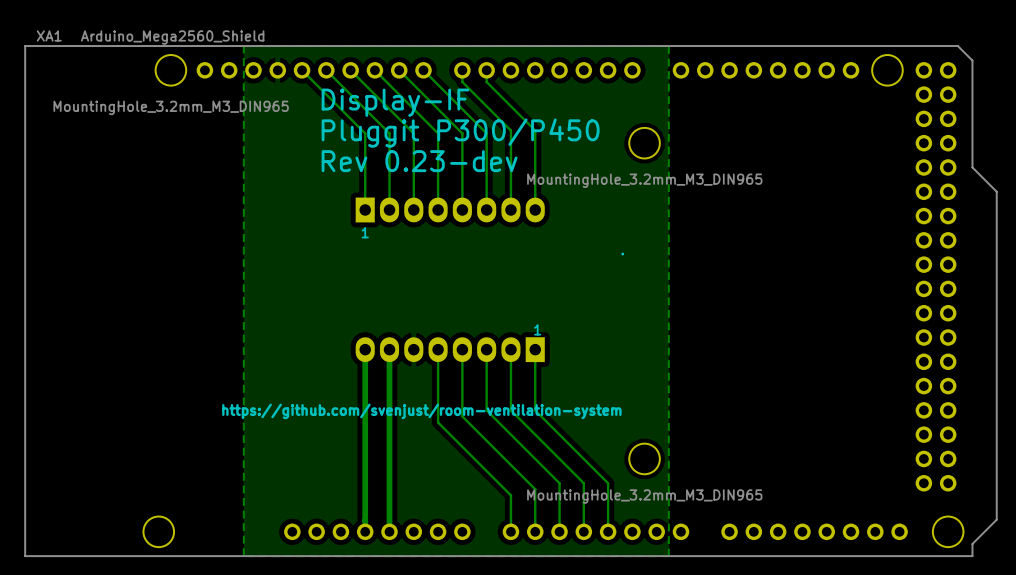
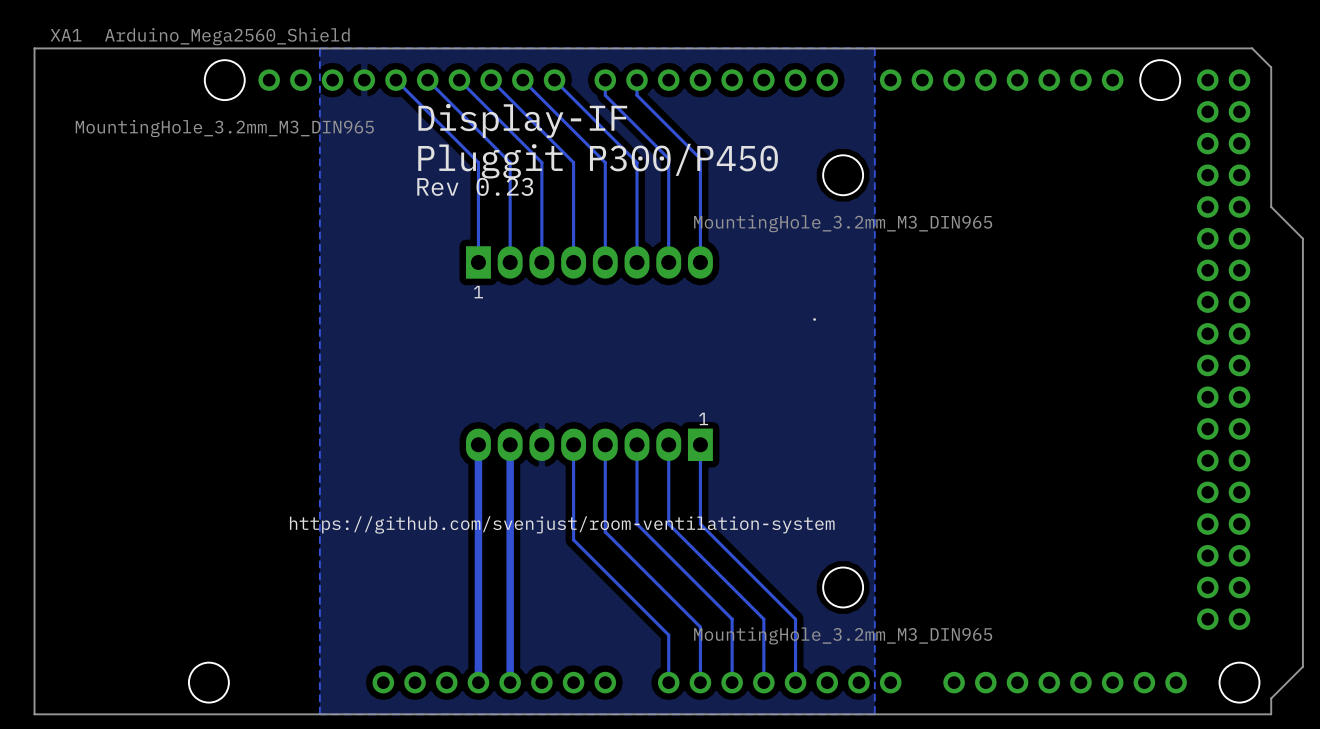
text: Rev 0.23-dev (419, 161) -> Rev 0.23 (475, 186)

